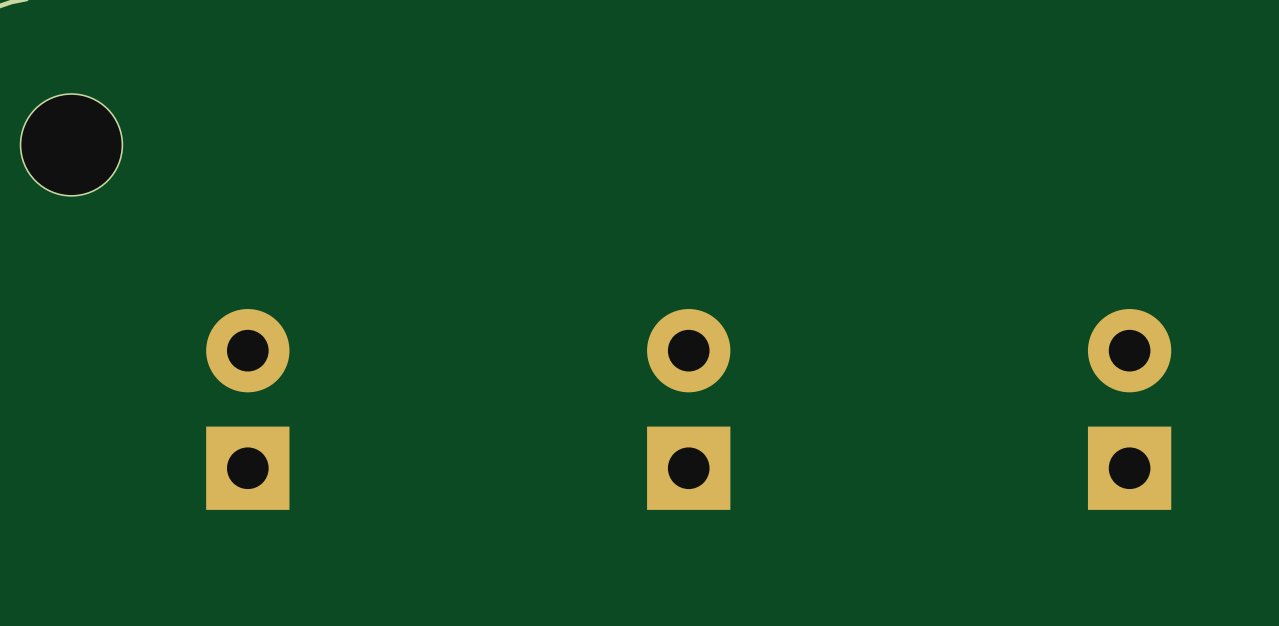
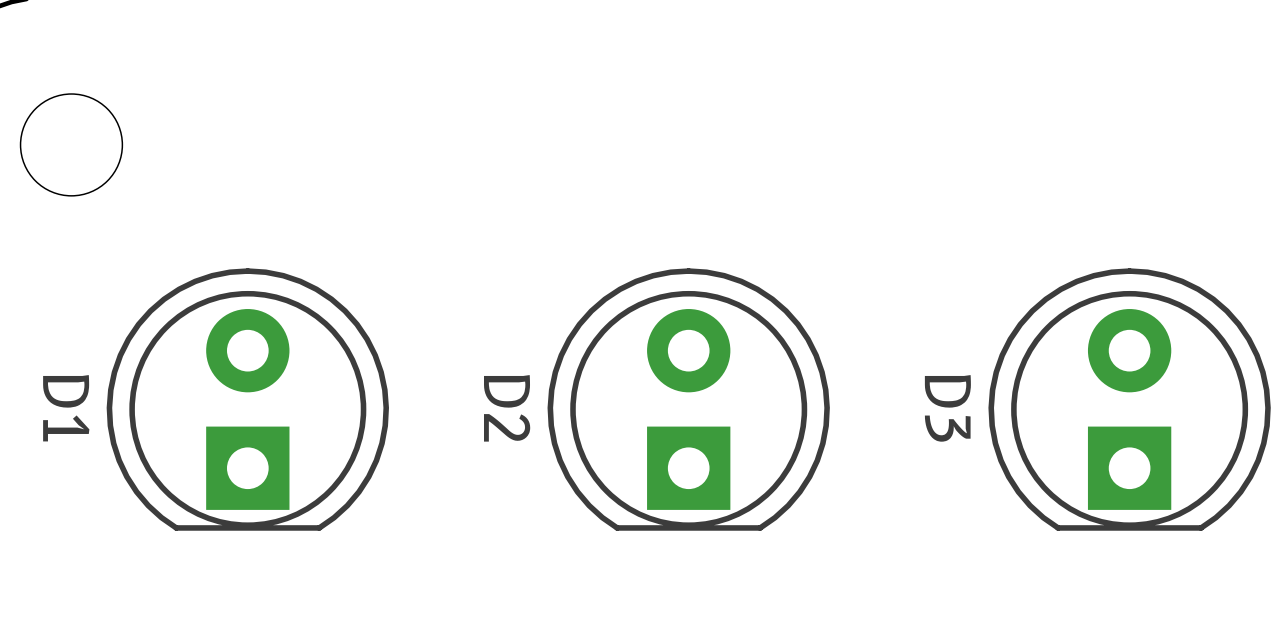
D3 side: top (247, 409) -> bottom (1129, 399)
D2 side: top (688, 409) -> bottom (688, 399)
D1 side: top (1129, 409) -> bottom (247, 399)

